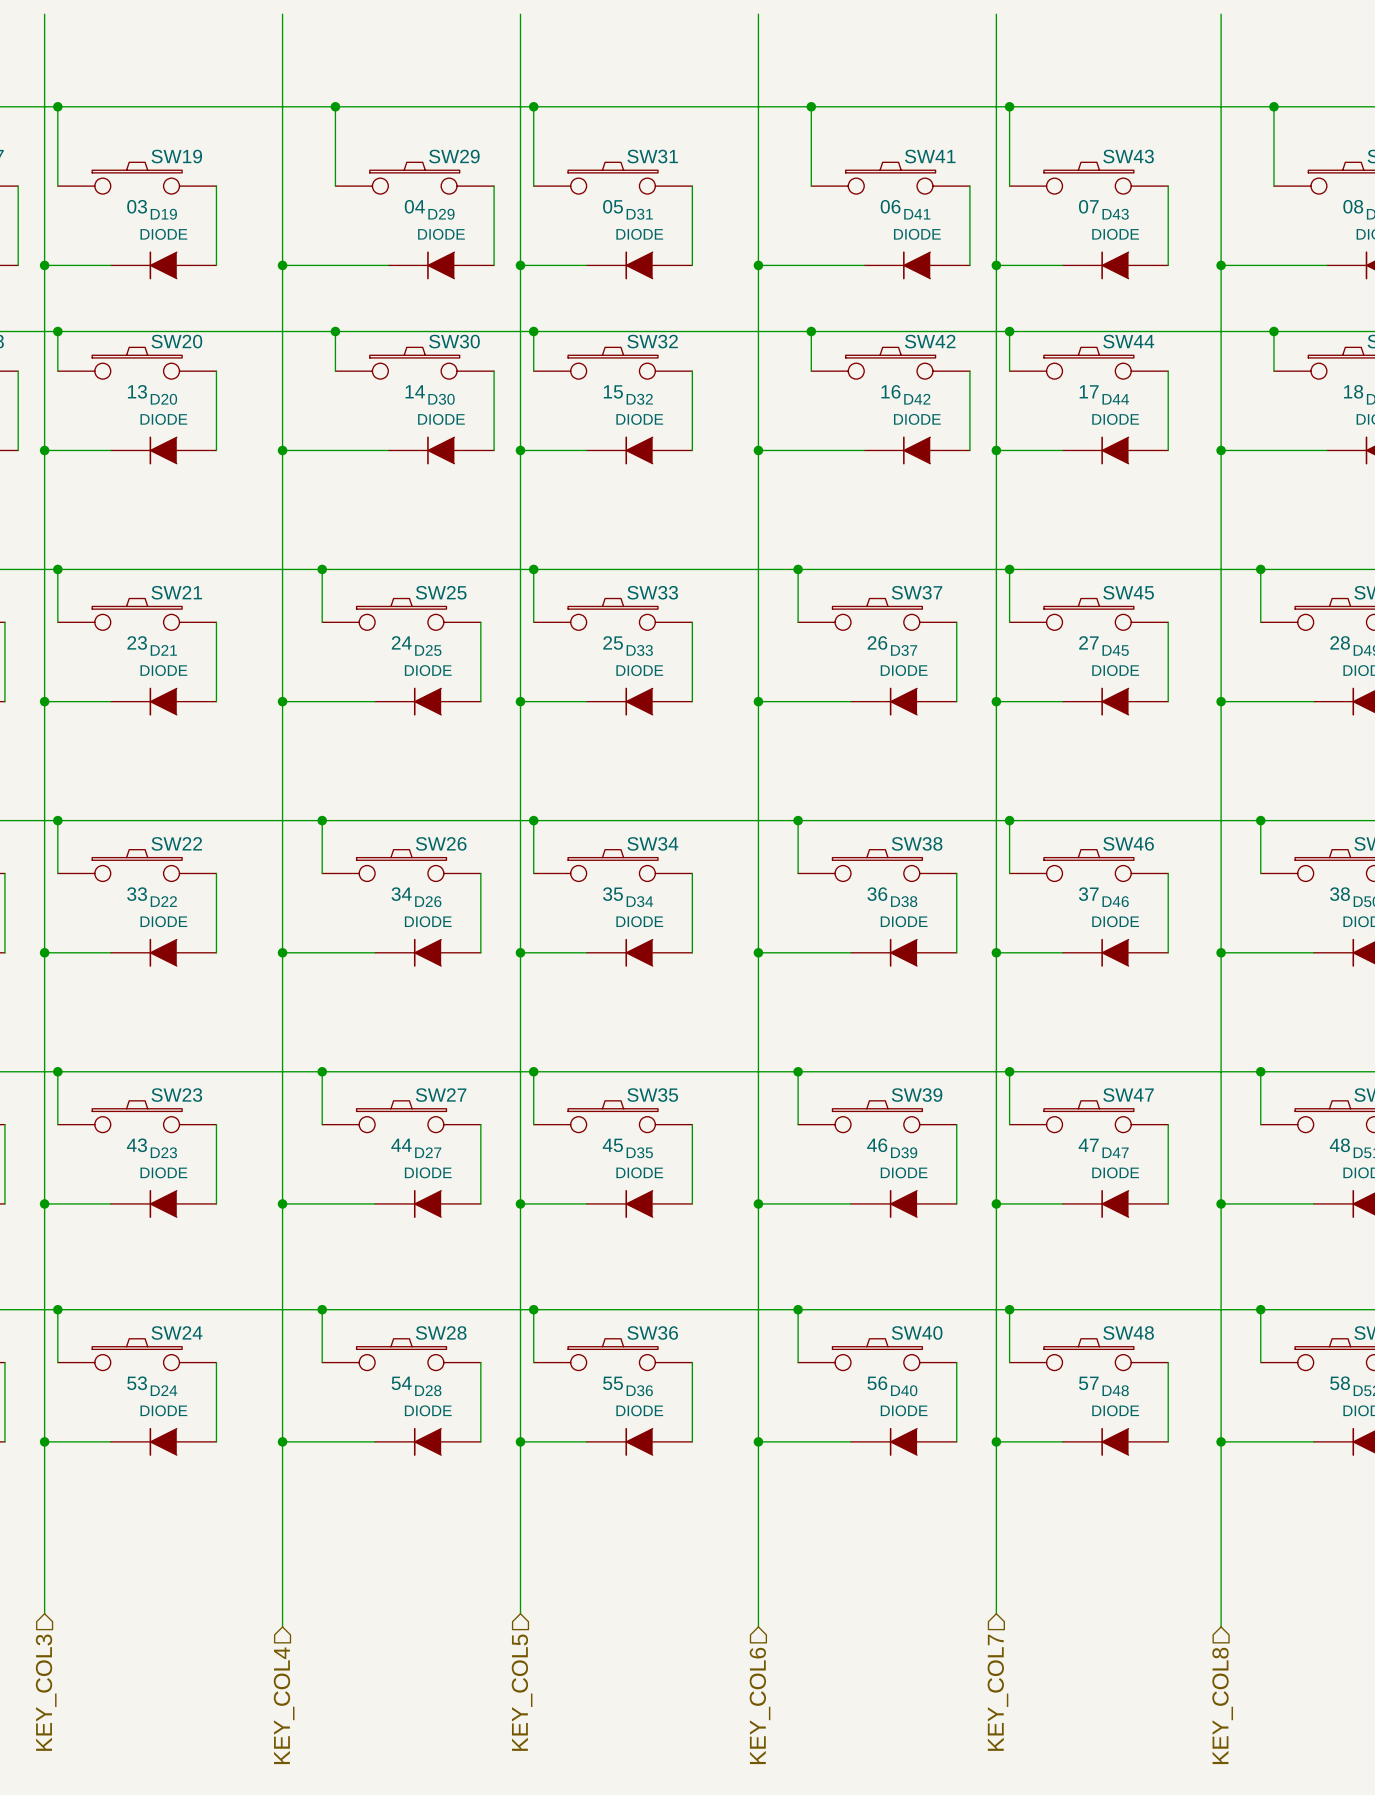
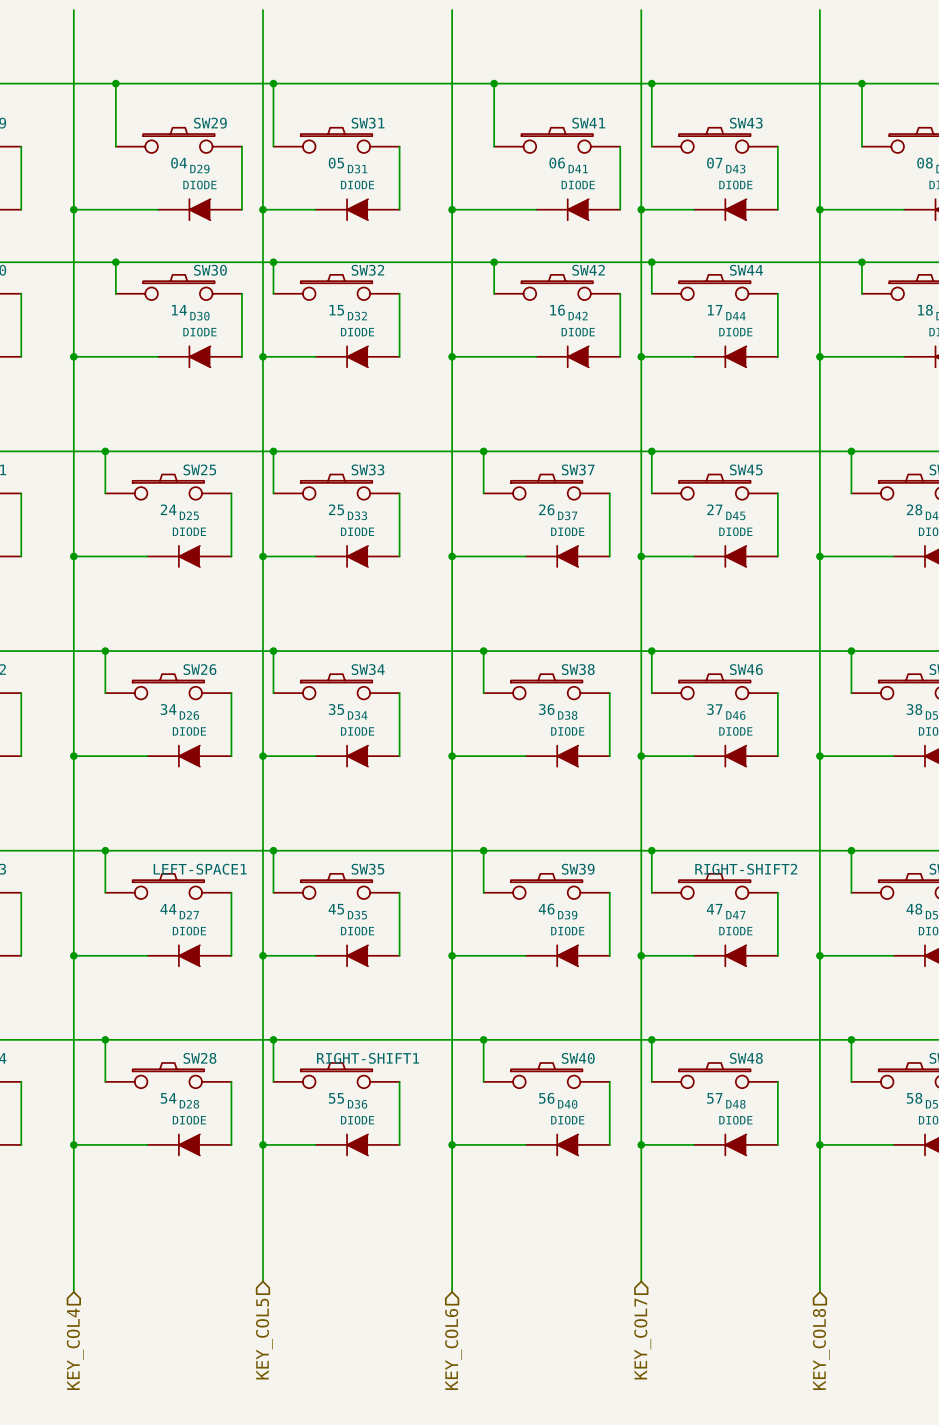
SW27 name: SW27 (441, 1095) -> LEFT-SPACE1 (200, 869)
SW47 name: SW47 (1128, 1095) -> RIGHT-SHIFT2 (746, 869)
SW36 name: SW36 (652, 1333) -> RIGHT-SHIFT1 (368, 1058)

